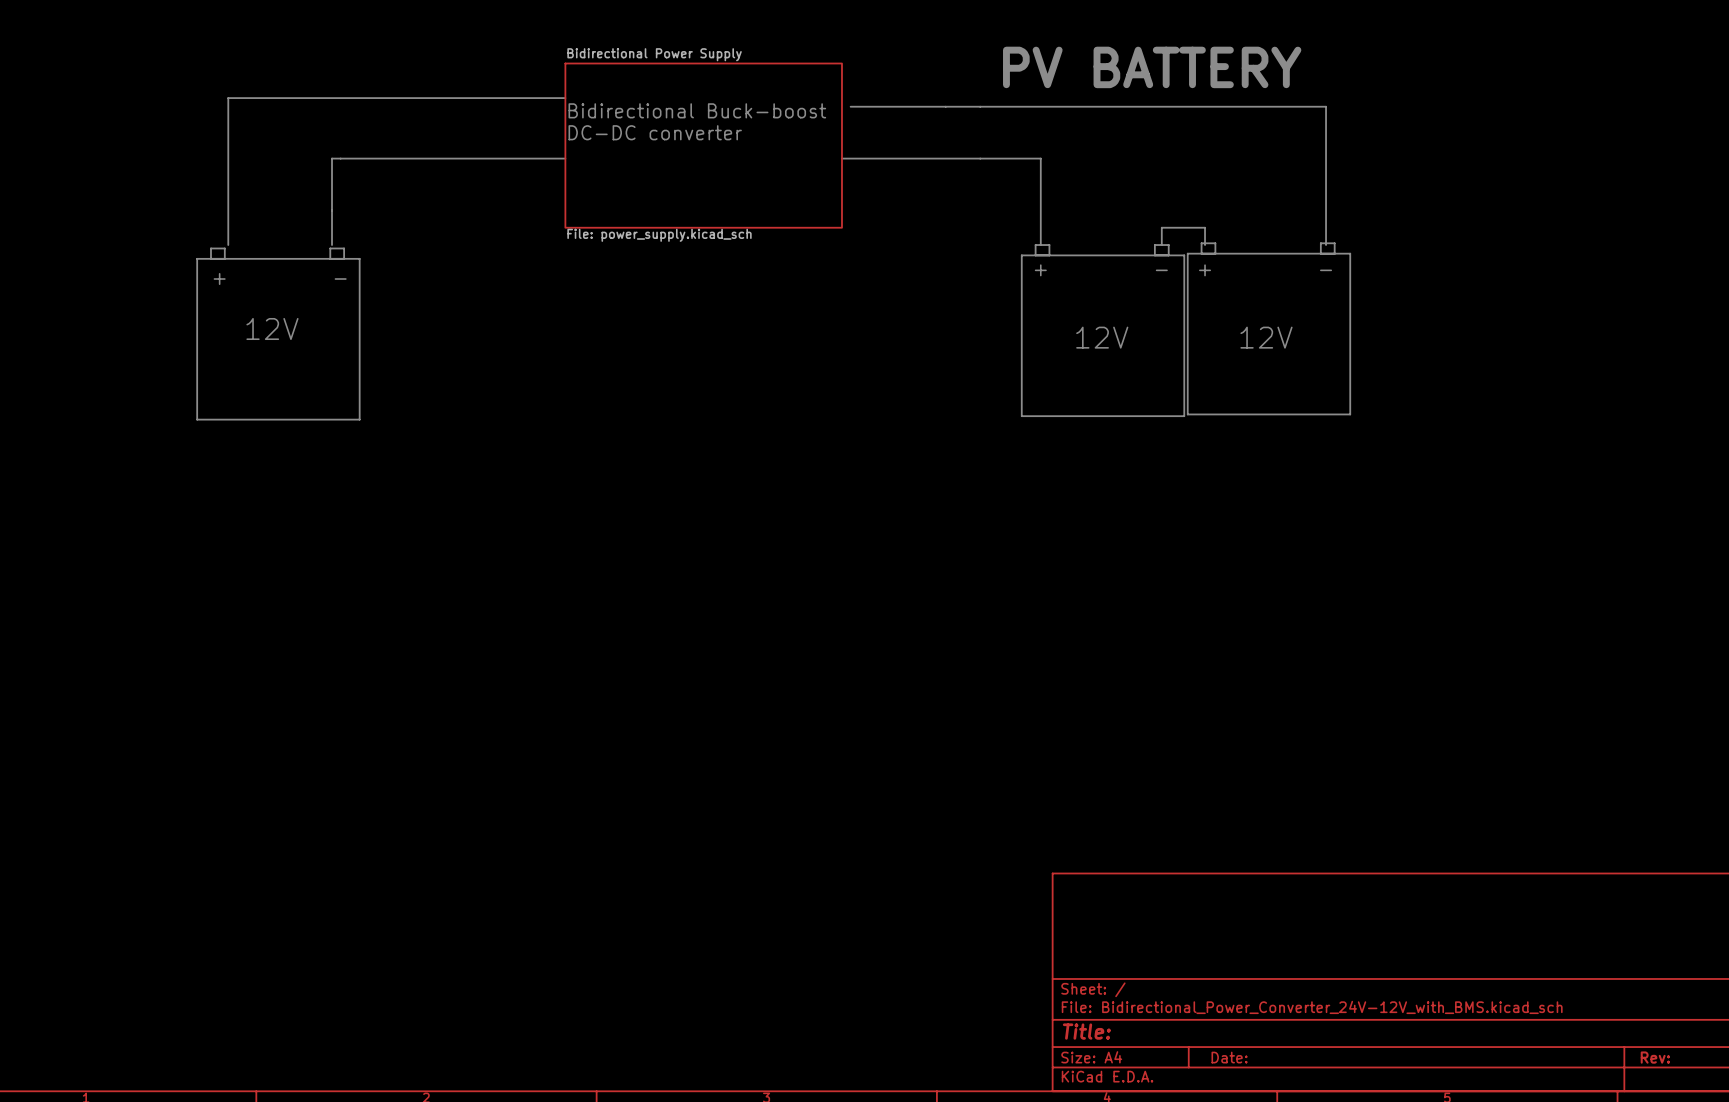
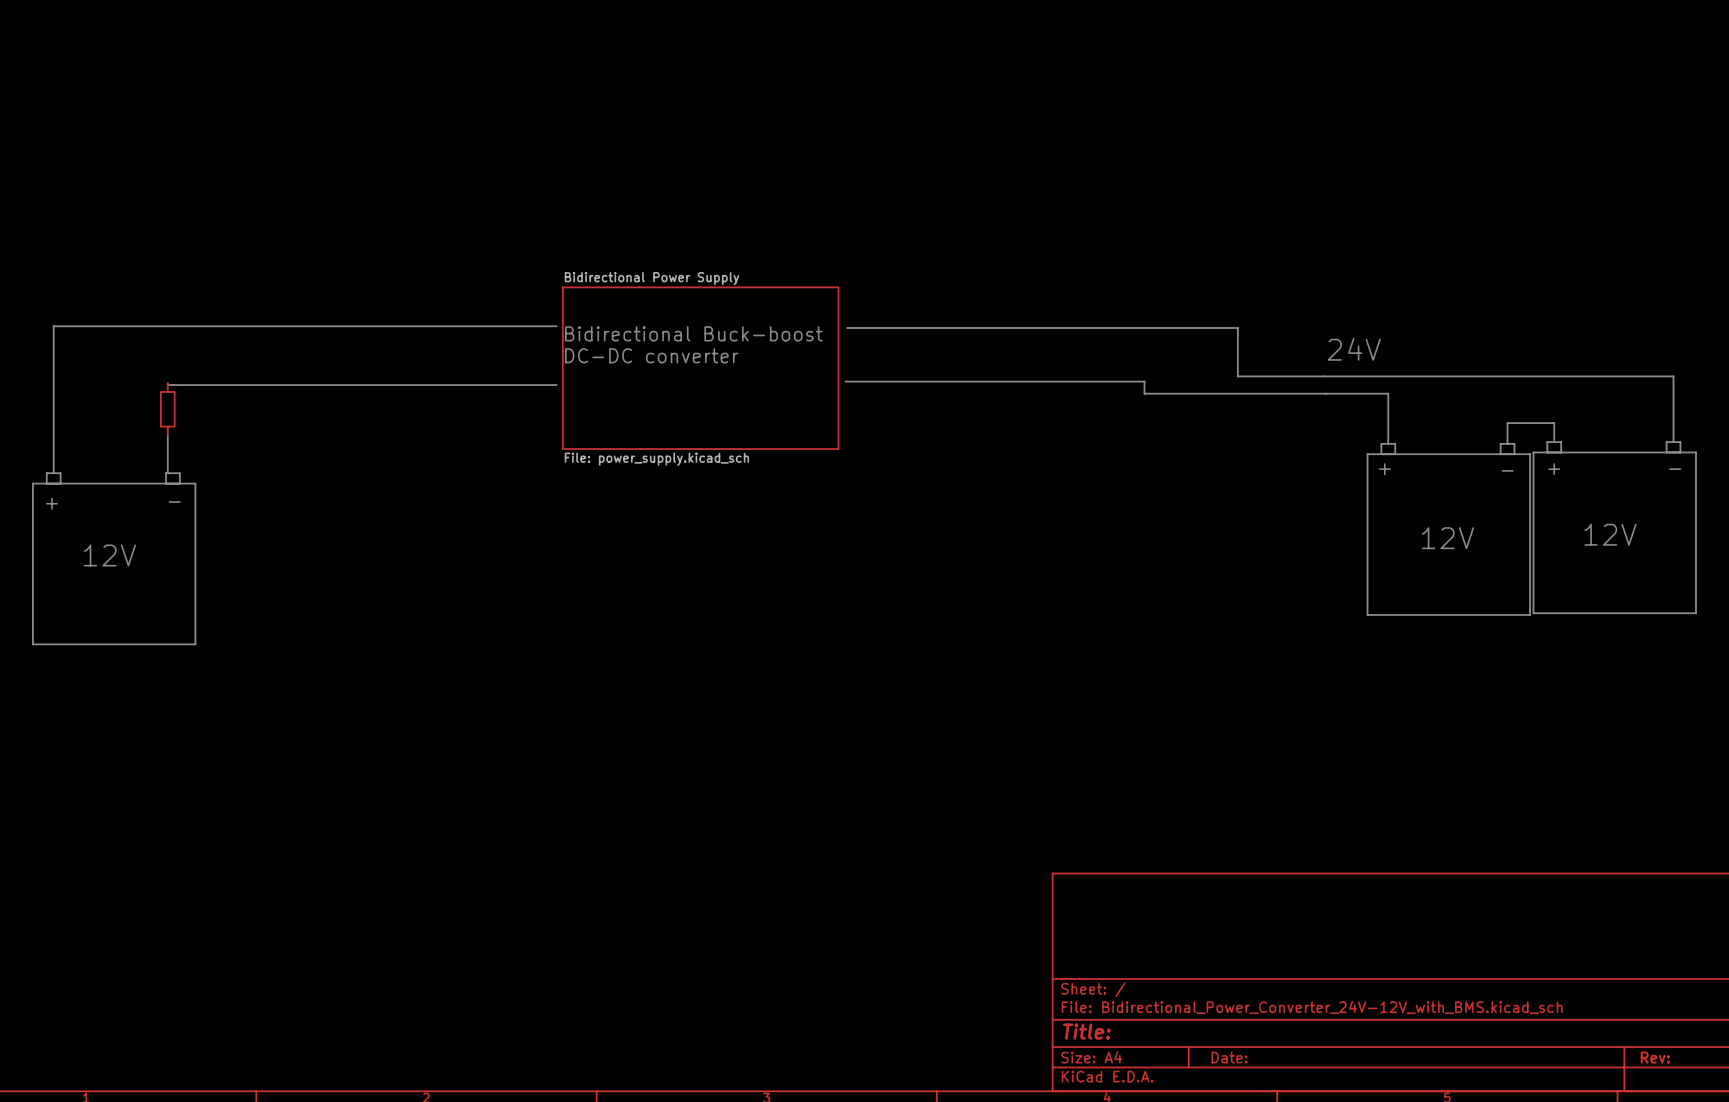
text: PV BATTERY (1152, 67) -> none
line: (565, 98) (228, 98) (228, 245) -> none
line: (850, 106) (1326, 106) (1326, 245) -> none
text: Bidirectional Buck-boost (697, 110) -> none
text: DC-DC converter (655, 132) -> none
sheet Bidirectional Power Supply: File: power_supply.kicad_sch (703, 145) -> none
line: (565, 158) (332, 158) (332, 245) -> none
line: (841, 158) (1040, 158) (1040, 245) -> none
line: (1161, 245) (1161, 227) (1205, 227) (1205, 245) -> none
line: (1187, 253) (1350, 253) (1350, 414) (1187, 414) (1187, 253) -> none
line: (1201, 253) (1201, 243) (1215, 243) (1215, 253) -> none
line: (1320, 253) (1320, 243) (1334, 243) (1334, 253) -> none
line: (1021, 255) (1184, 255) (1184, 416) (1021, 416) (1021, 255) -> none
line: (1035, 255) (1035, 245) (1049, 245) (1049, 255) -> none
line: (1154, 255) (1154, 245) (1168, 245) (1168, 255) -> none
line: (197, 258) (359, 258) (359, 419) (197, 419) (197, 258) -> none
line: (210, 258) (210, 248) (224, 248) (224, 258) -> none
line: (330, 258) (330, 248) (344, 248) (344, 258) -> none
text: + (1040, 270) -> none
text: - (1161, 270) -> none
text: + (1205, 270) -> none
text: - (1326, 270) -> none
text: + (219, 279) -> none
text: - (340, 279) -> none
line: none -> (556, 326) (53, 326) (53, 473)
text: 12V (272, 328) -> none
line: none -> (847, 328) (1237, 328) (1237, 376) (1673, 376) (1673, 442)
text: none -> Bidirectional Buck-boost (693, 333)
text: 12V (1102, 337) -> none
text: 12V (1266, 337) -> none
text: none -> 24V (1354, 349)
text: none -> DC-DC converter (651, 355)
sheet Bidirectional Power Supply: none -> File: power_supply.kicad_sch (700, 368)
line: none -> (845, 381) (1144, 381) (1144, 393) (1388, 393) (1388, 443)
line: none -> (167, 383) (167, 385) (556, 385)
part: none -> (167, 409)
line: none -> (167, 435) (167, 473)
line: none -> (1554, 440) (1554, 423) (1507, 423) (1507, 443)
line: none -> (1533, 452) (1695, 452) (1695, 613) (1533, 613) (1533, 452)
line: none -> (1547, 452) (1547, 442) (1561, 442) (1561, 452)
line: none -> (1666, 452) (1666, 442) (1680, 442) (1680, 452)
line: none -> (1367, 454) (1530, 454) (1530, 614) (1367, 614) (1367, 454)
line: none -> (1381, 454) (1381, 443) (1395, 443) (1395, 454)
line: none -> (1500, 454) (1500, 443) (1514, 443) (1514, 454)
text: none -> + (1384, 469)
text: none -> + (1554, 469)
text: none -> - (1675, 469)
text: none -> - (1507, 470)
line: none -> (32, 483) (195, 483) (195, 644) (32, 644) (32, 483)
line: none -> (46, 483) (46, 473) (60, 473) (60, 483)
line: none -> (166, 483) (166, 473) (179, 473) (179, 483)
text: none -> - (174, 502)
text: none -> + (51, 503)
text: none -> 12V (1610, 534)
text: none -> 12V (1448, 538)
text: none -> 12V (109, 555)

